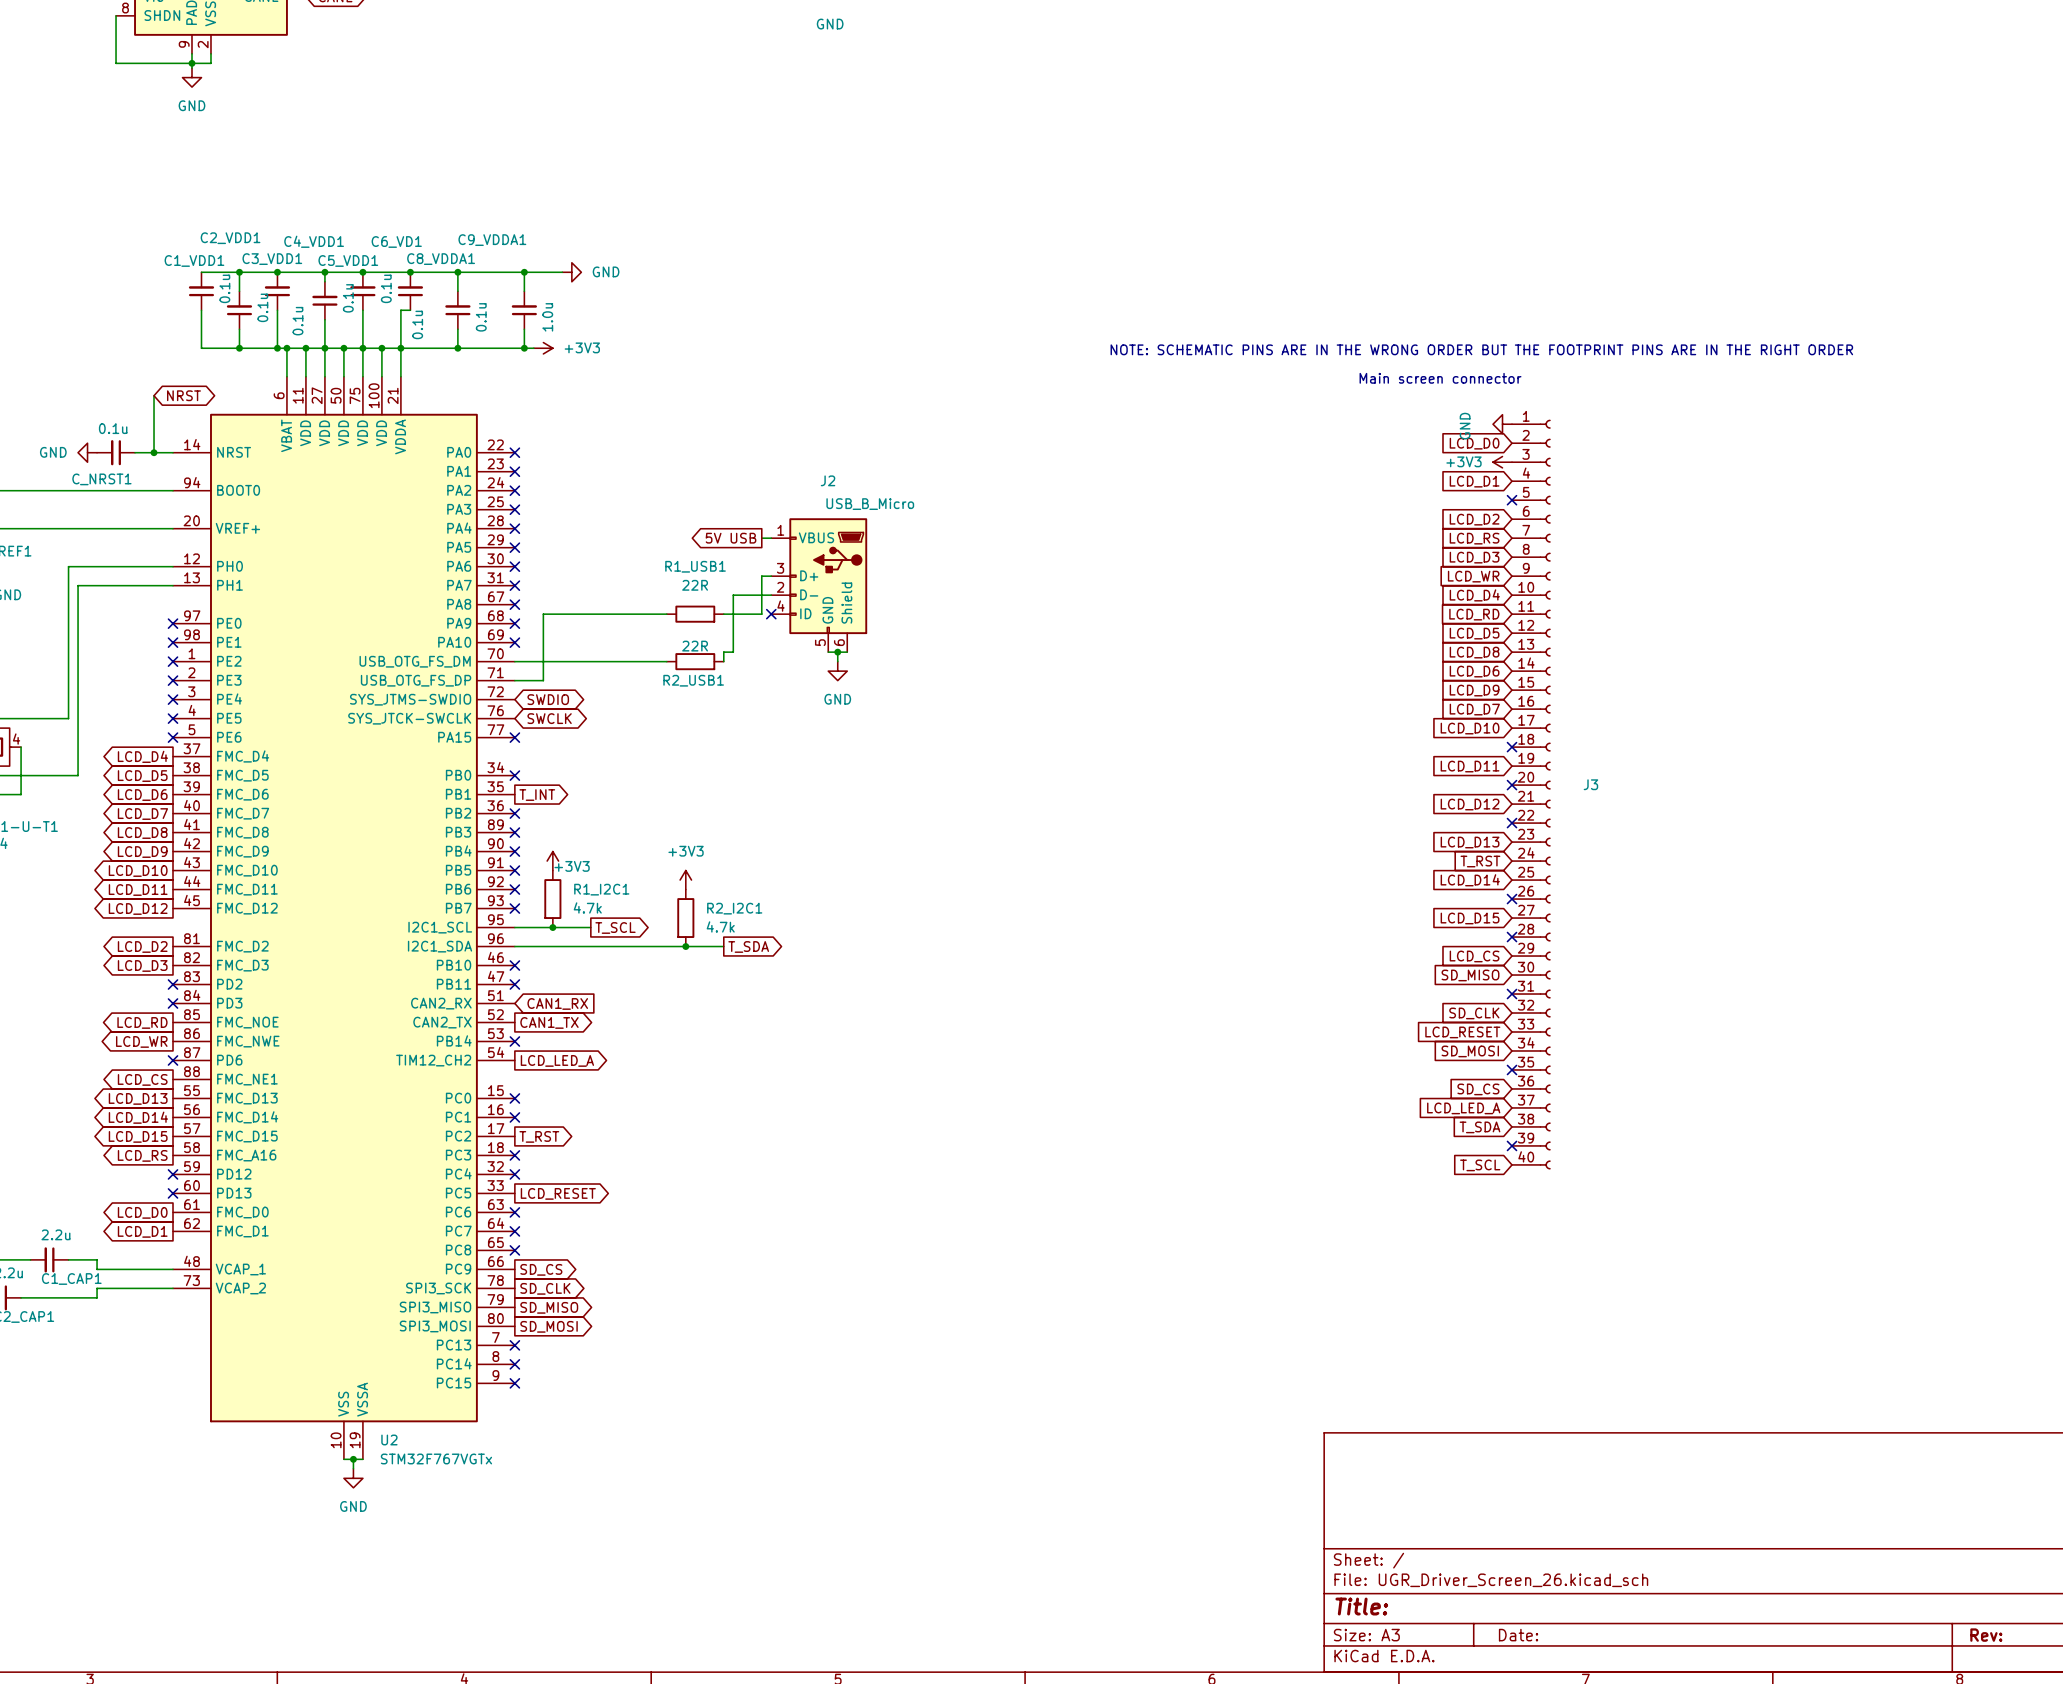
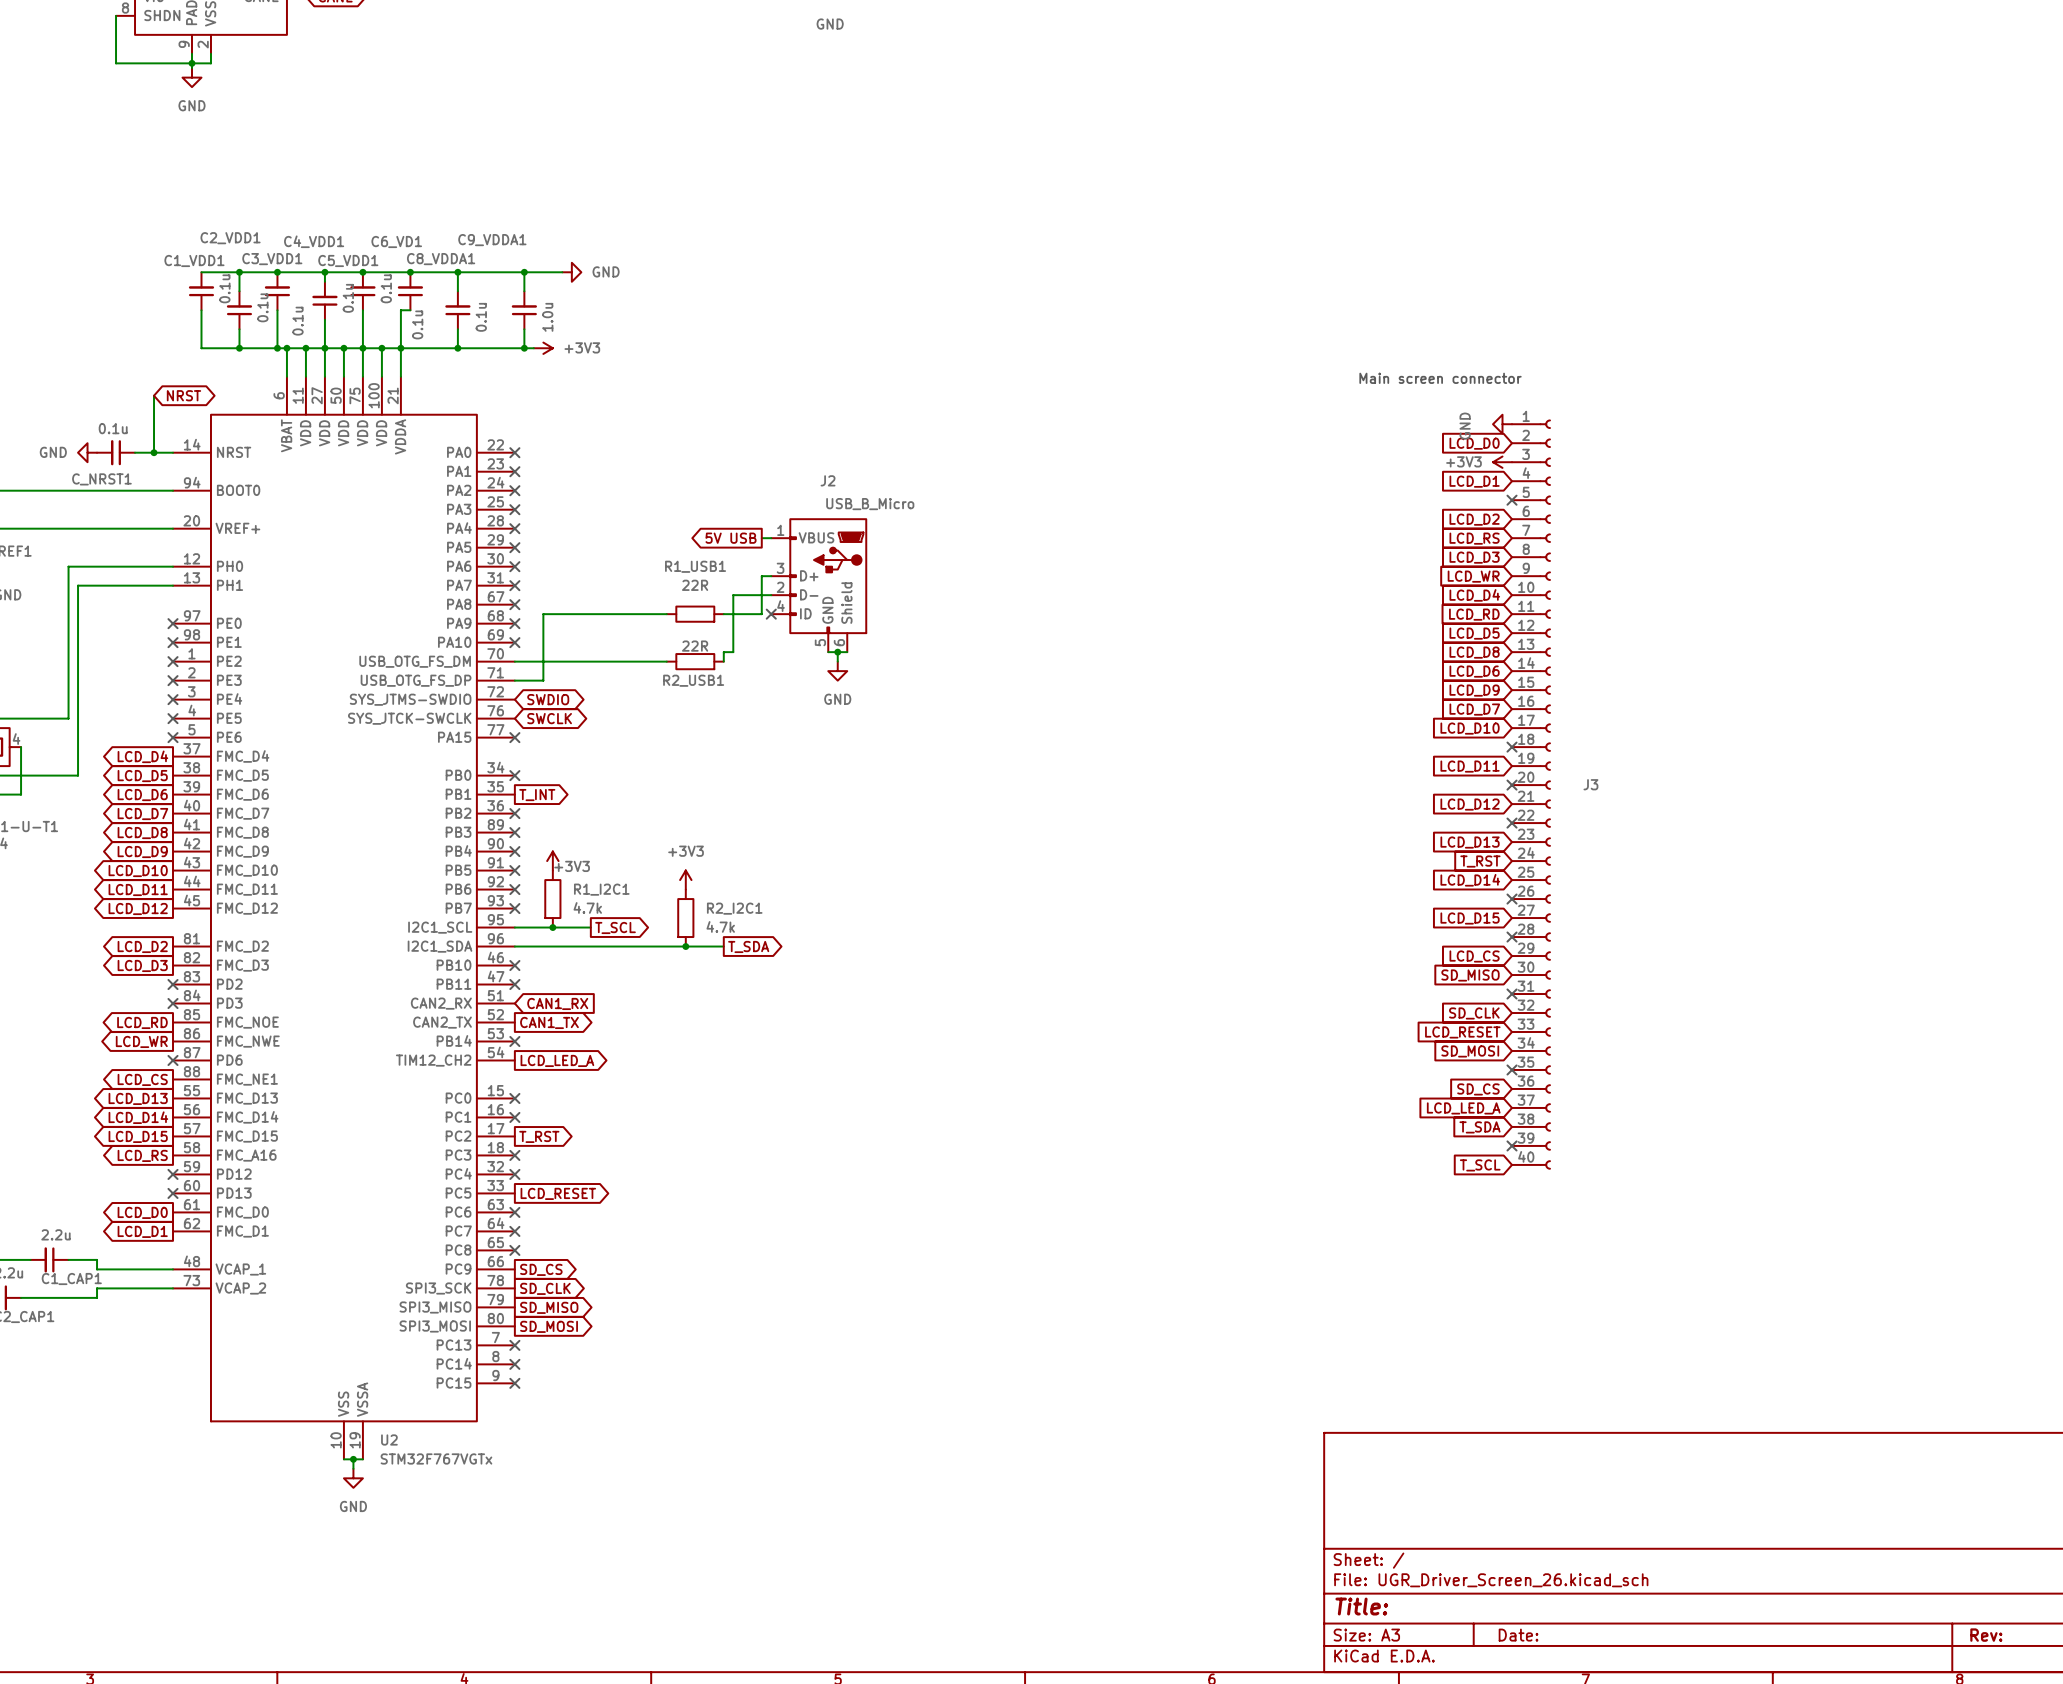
text: NOTE: SCHEMATIC PINS ARE IN THE WRONG ORDER BUT THE FOOTPRINT PINS ARE IN THE RIGHT ORDER (1481, 349) -> none

